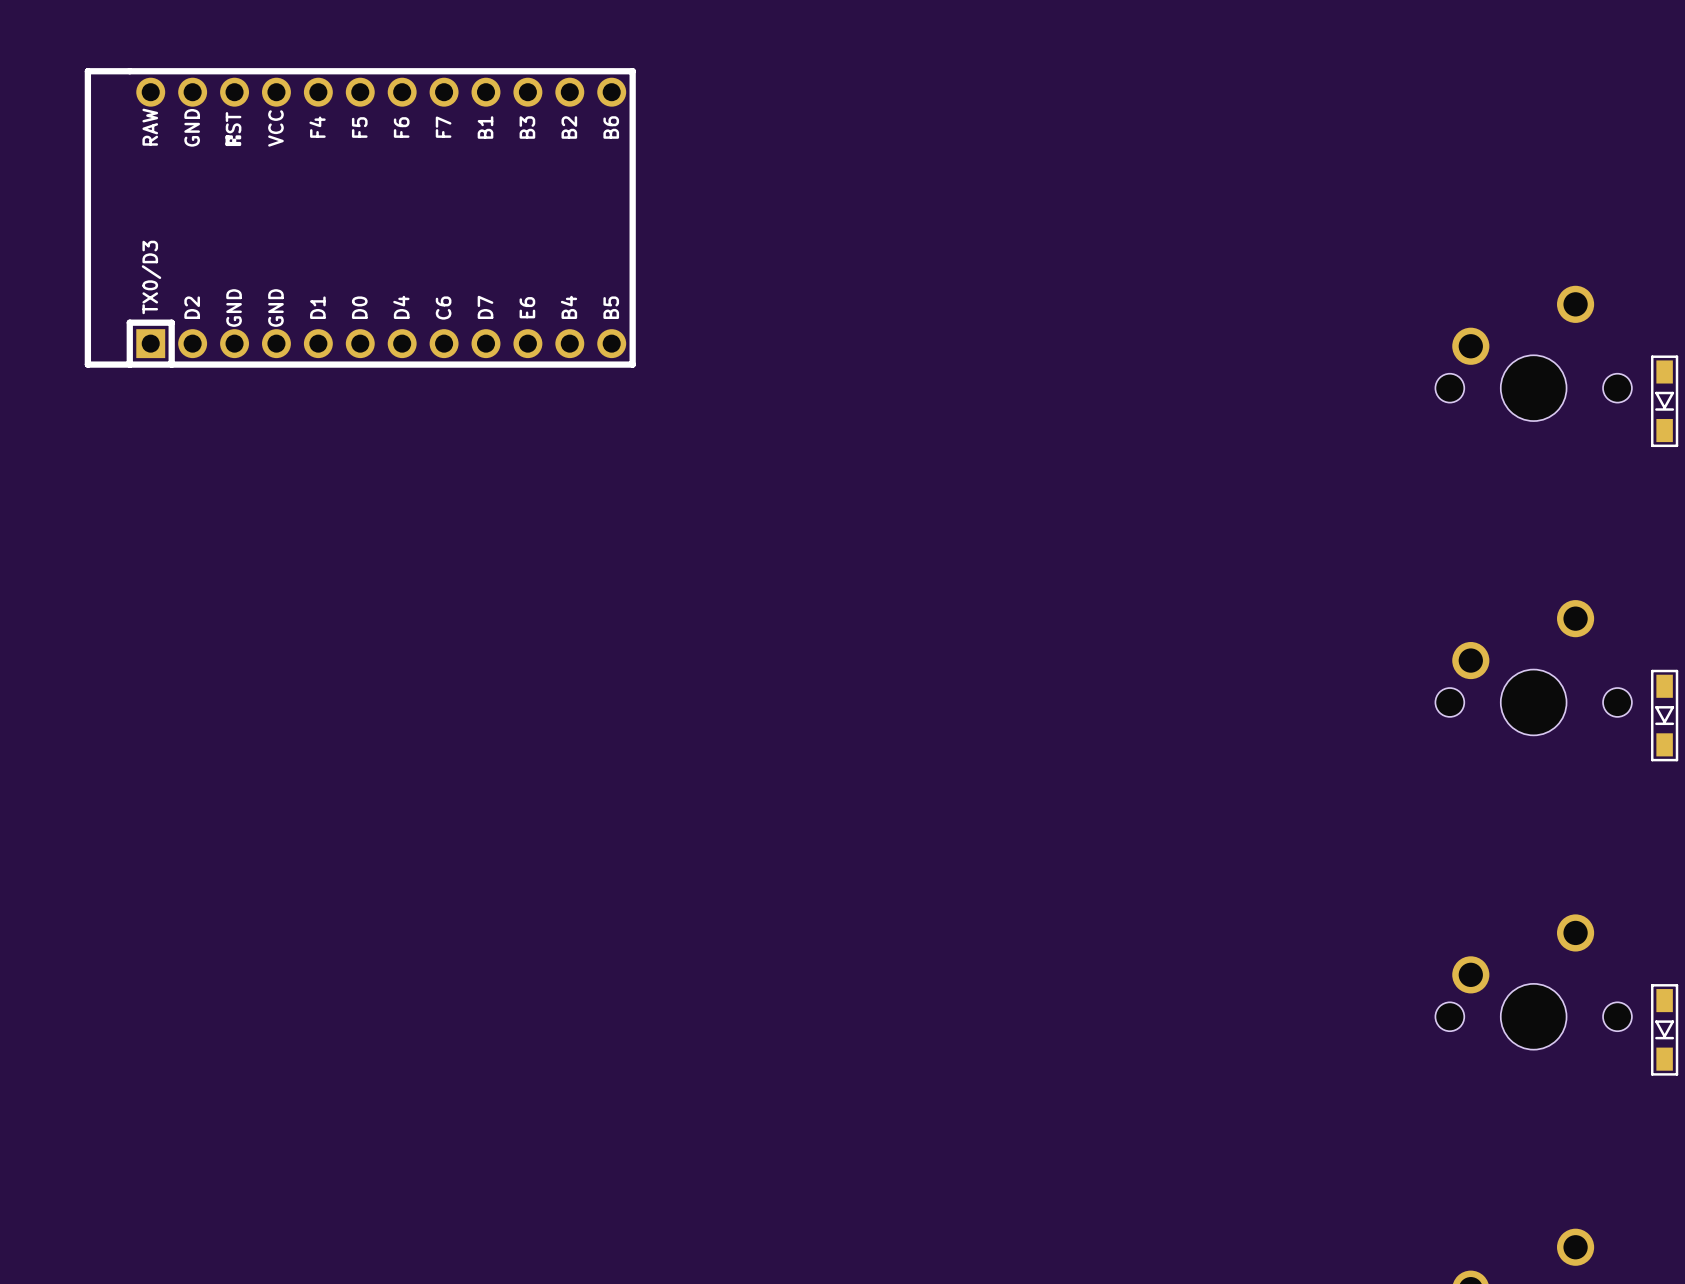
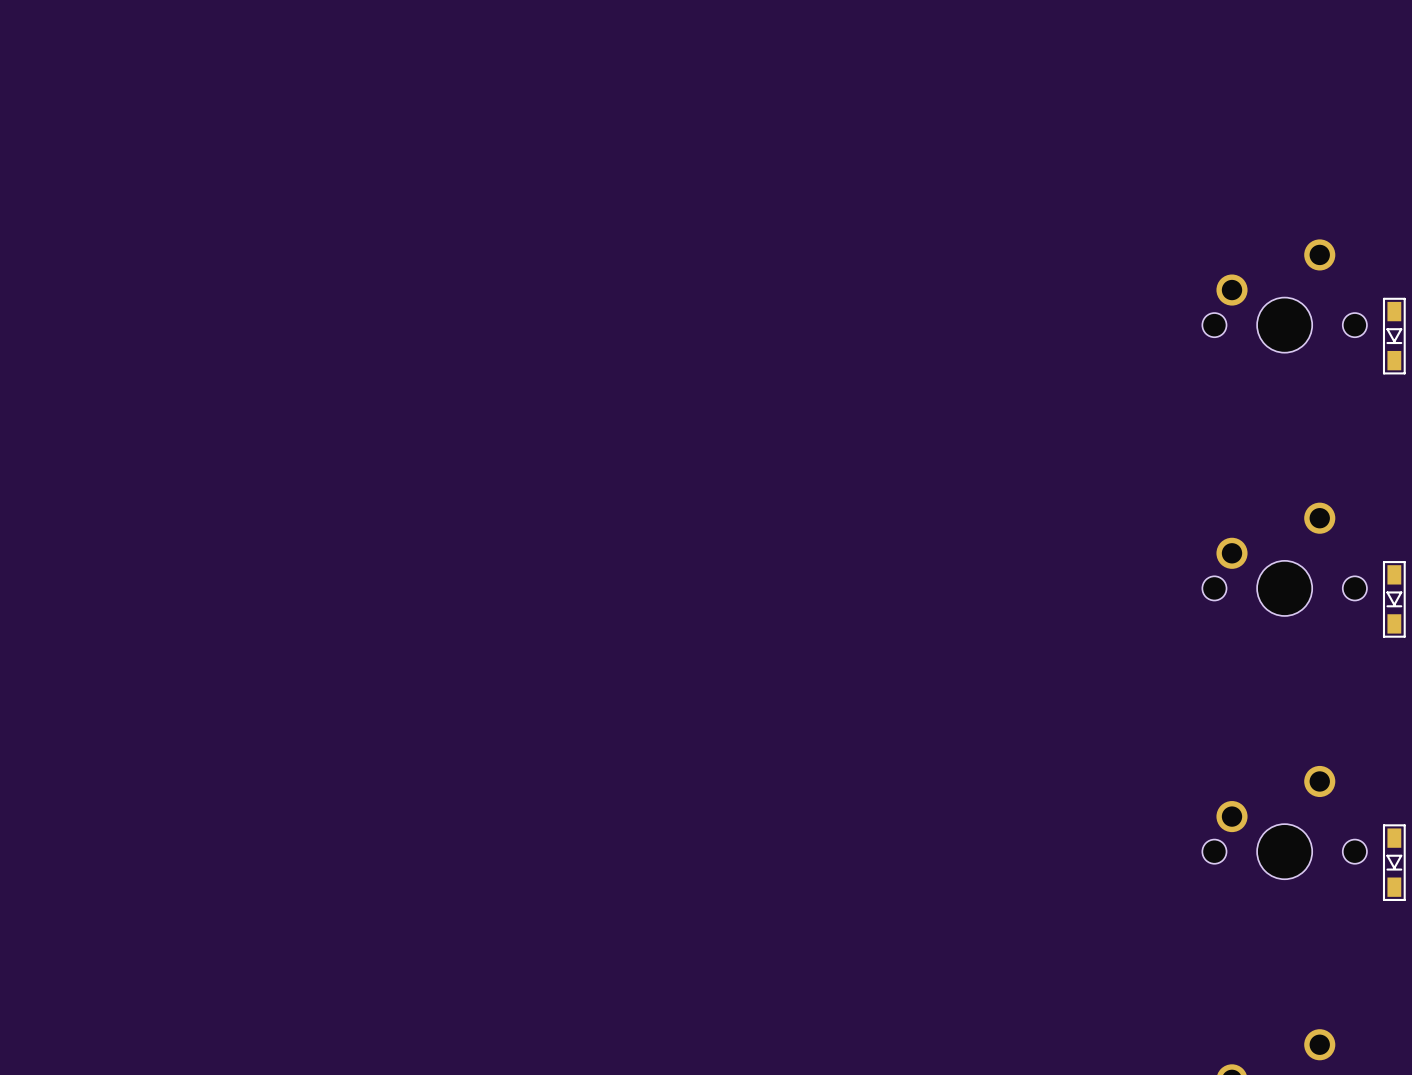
part: (360, 217) -> none

